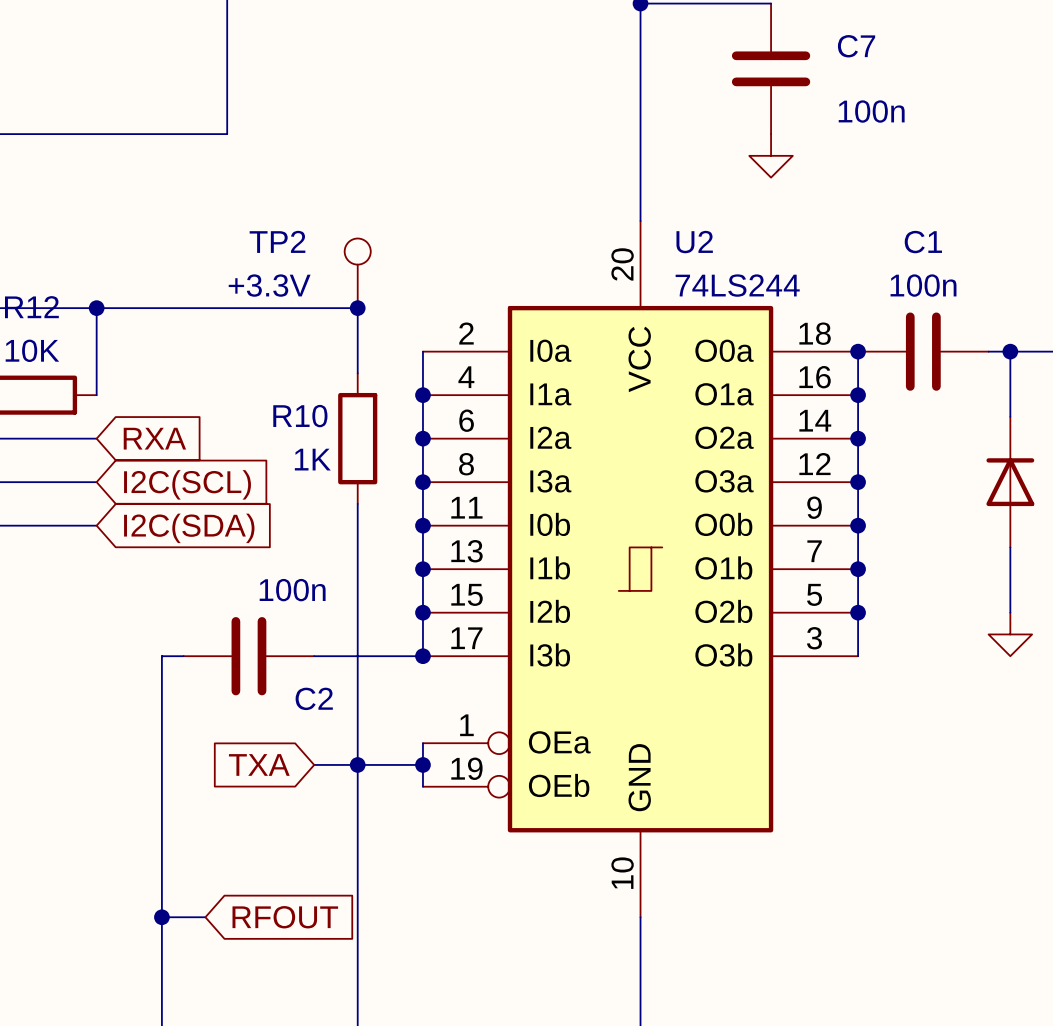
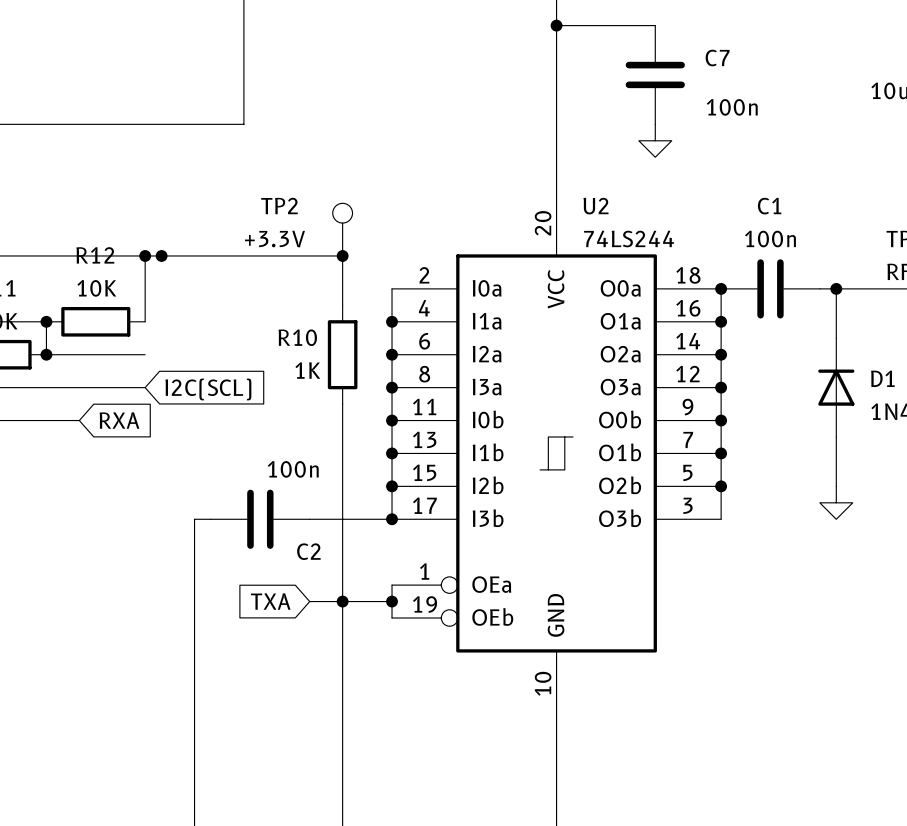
junction: none -> (161, 255)
global label position: RXA (154, 438) -> RXA (119, 420)
wire: (9, 525) (96, 525) -> none
global label: I2C(SDA) (189, 528) -> none
wire: (161, 917) (205, 917) -> none
junction: (161, 917) -> none
global label: RFOUT (285, 917) -> none

